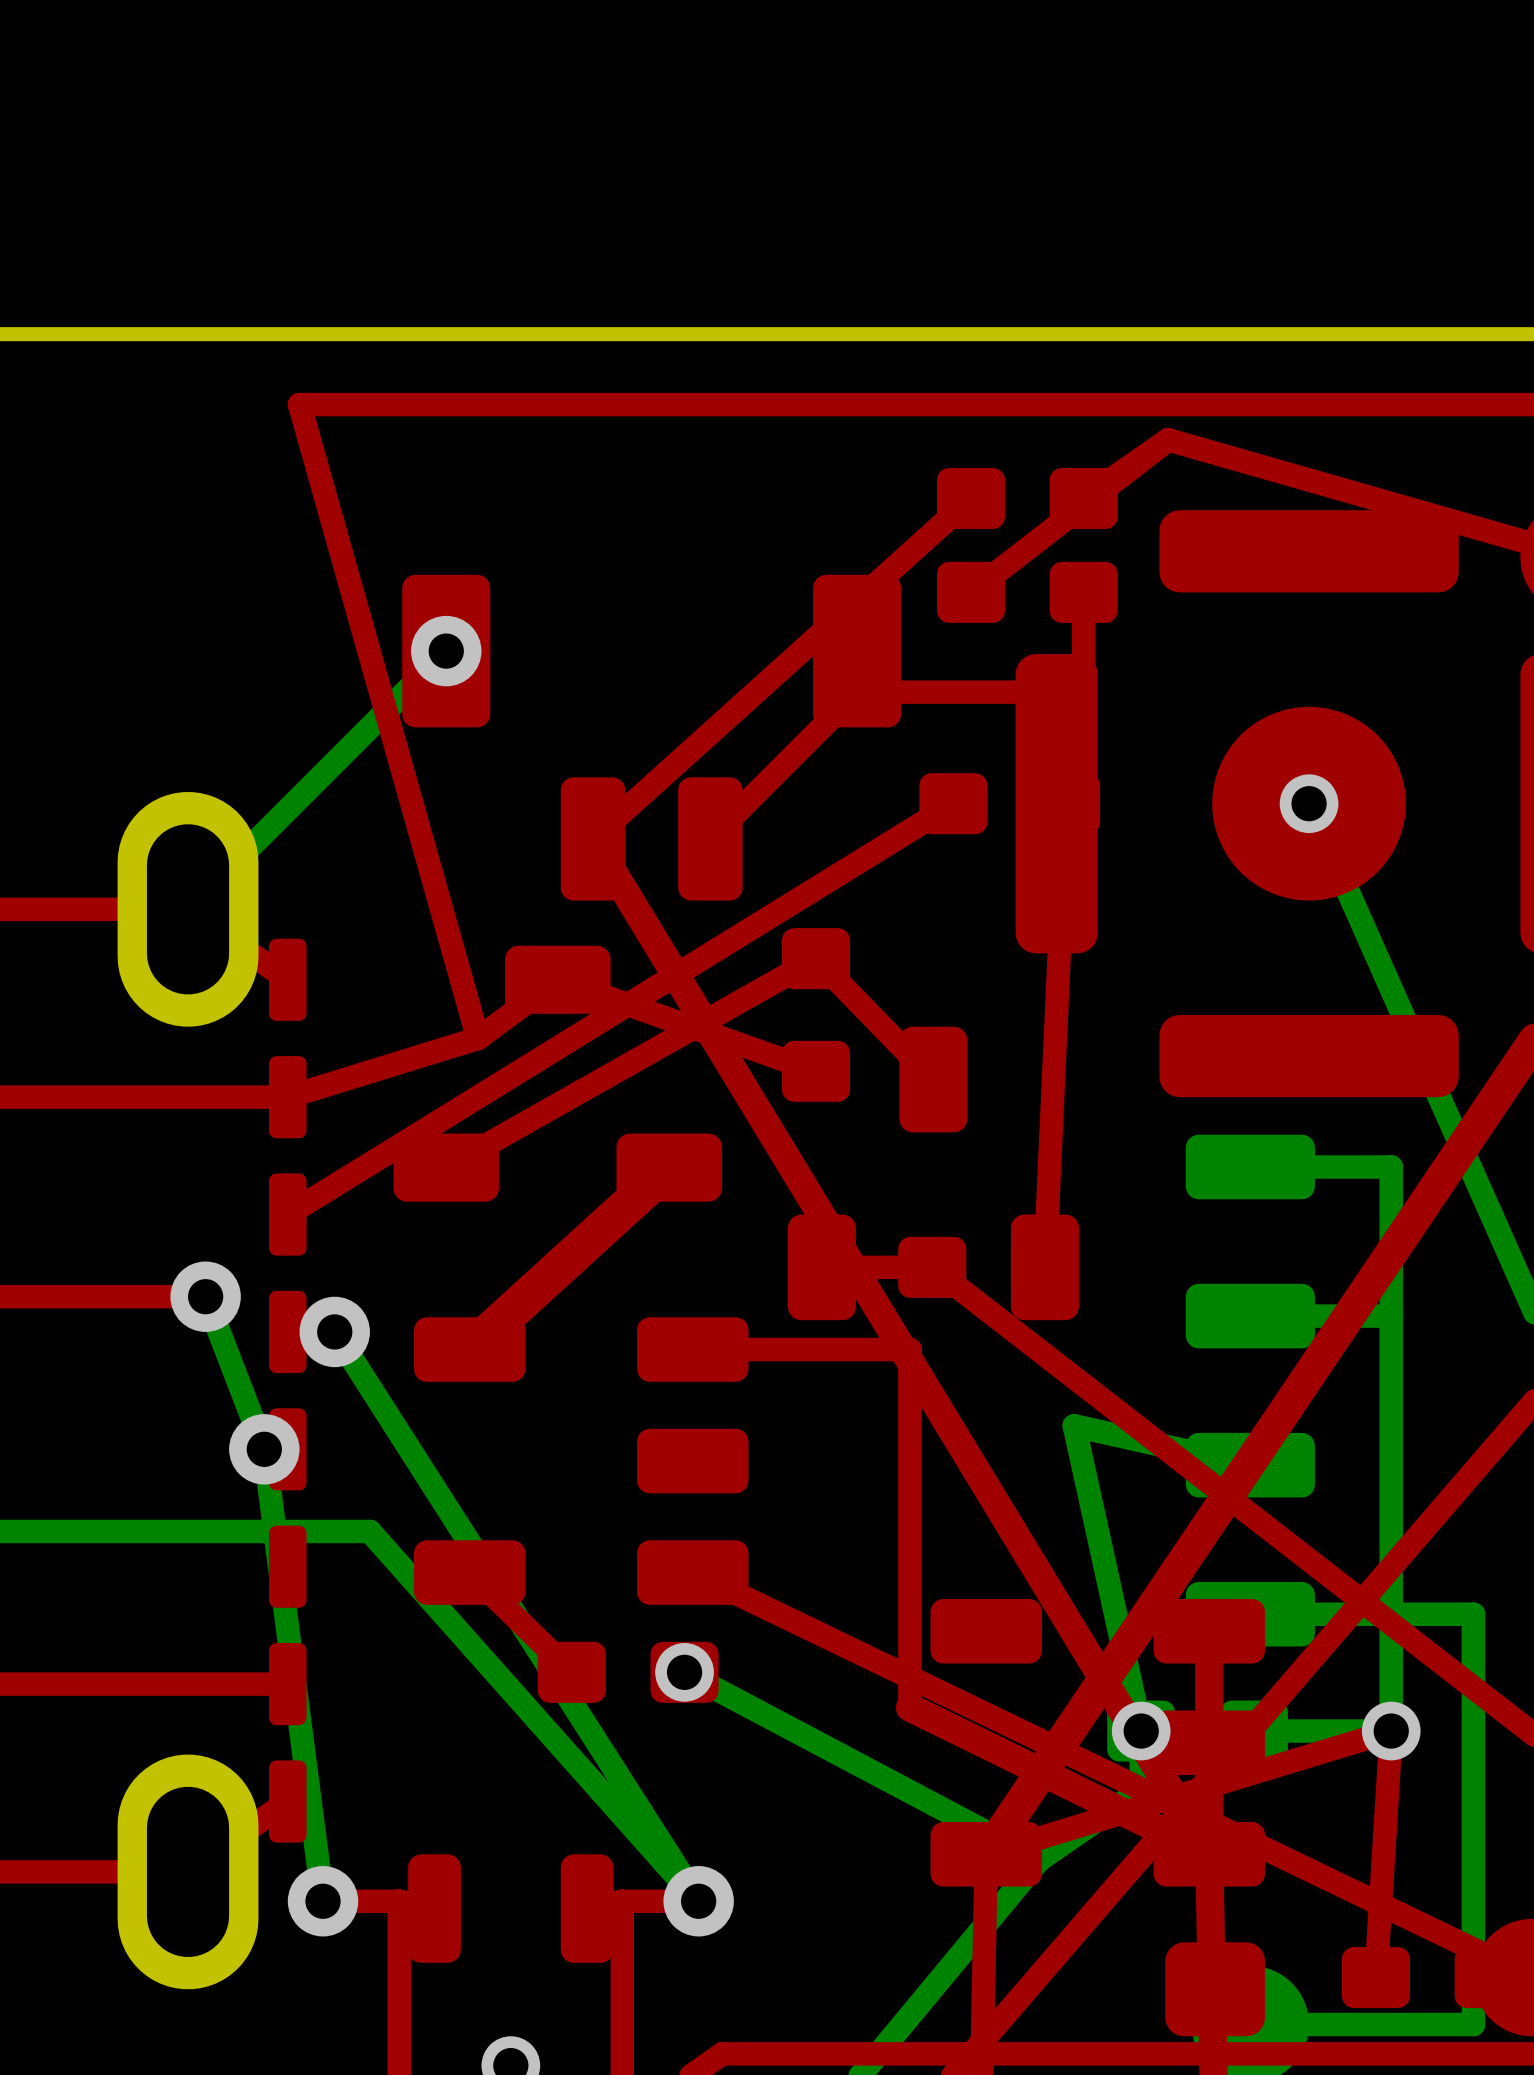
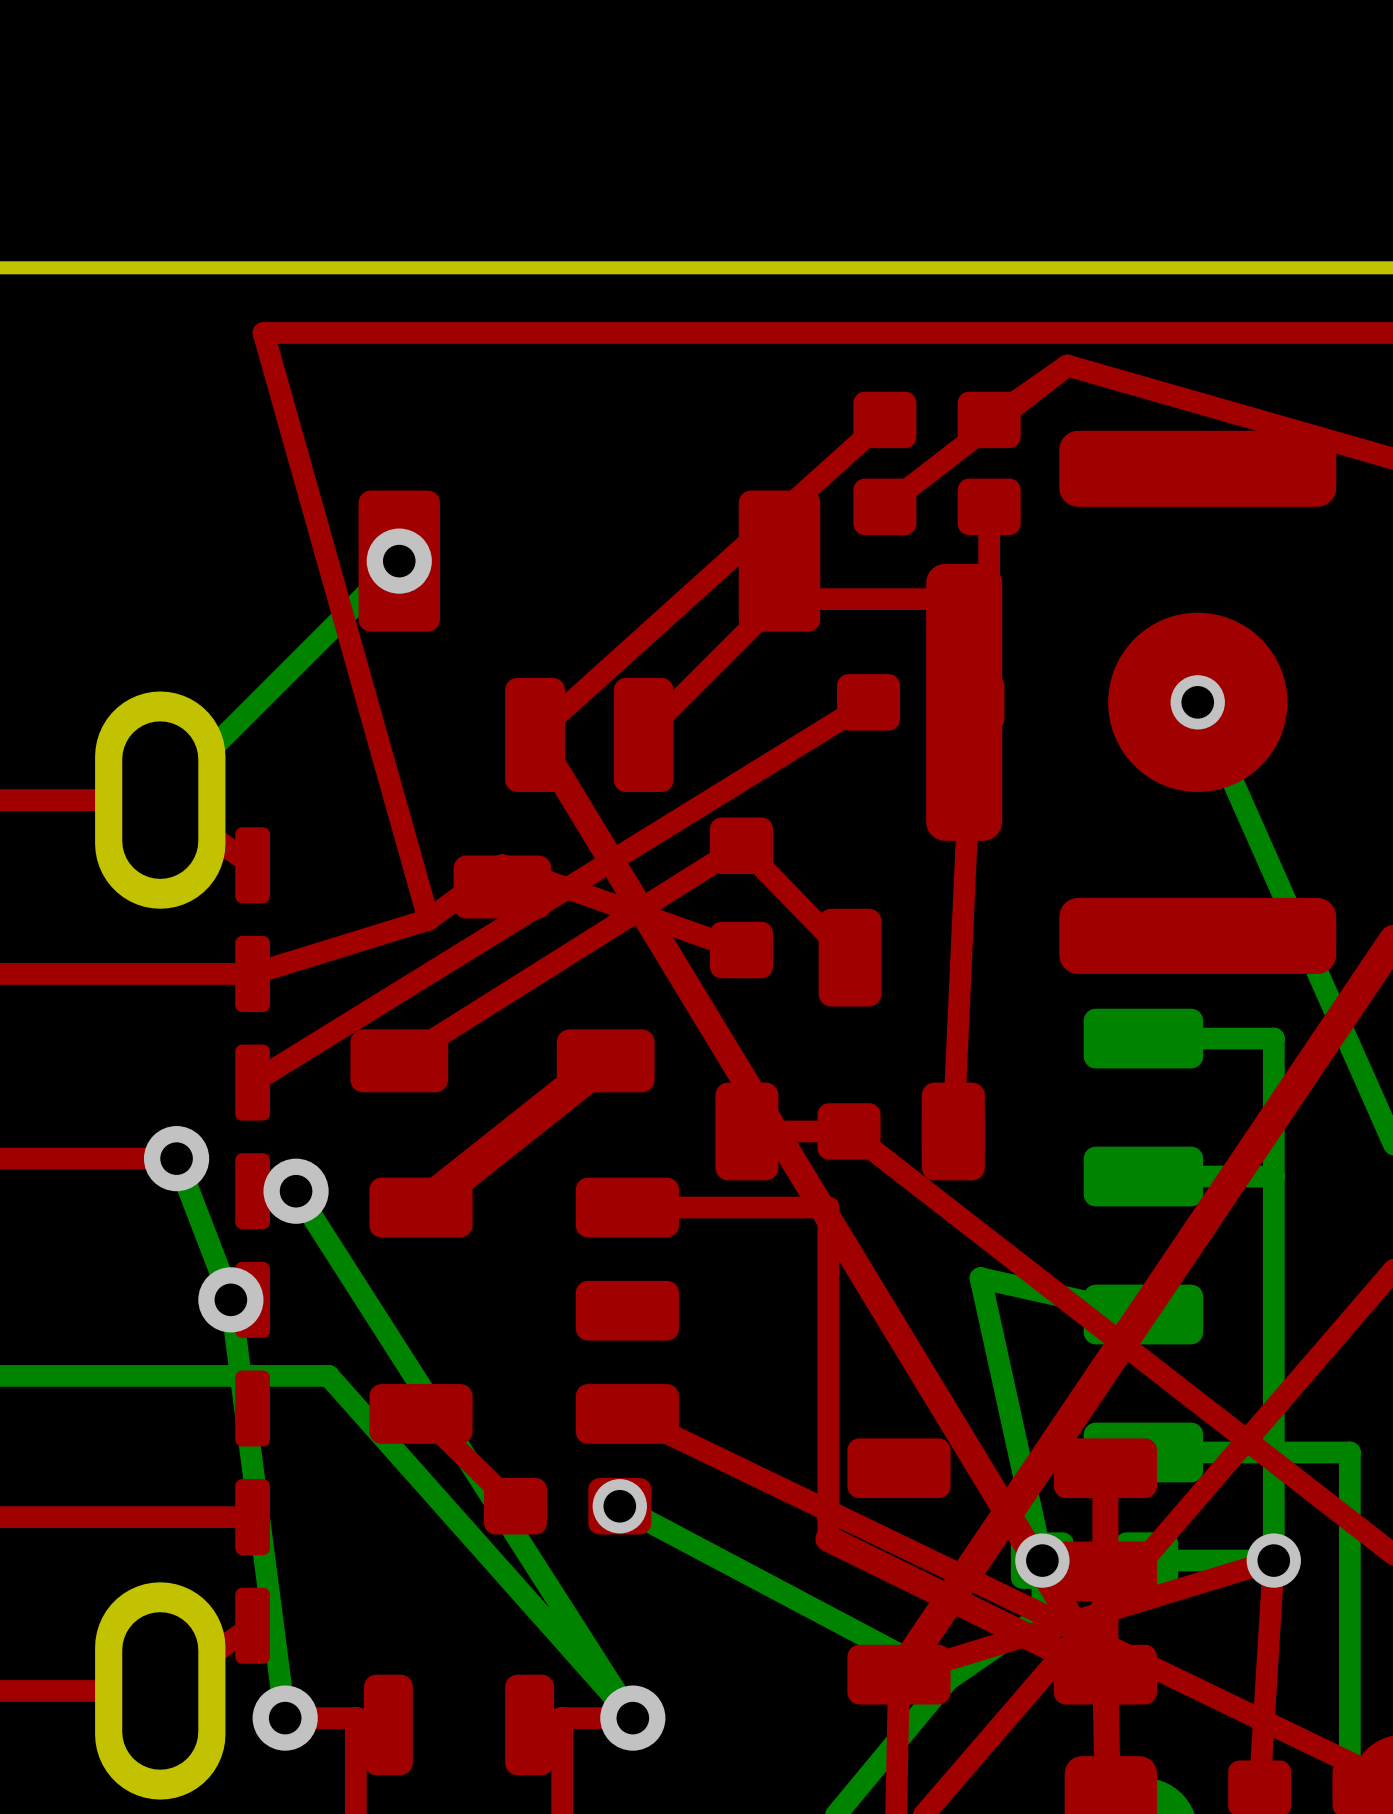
top track: (816, 958) (446, 1167) -> (741, 845) (399, 1060)
part position: (557, 1073) -> (502, 973)
top track: (669, 1167) (469, 1349) -> (605, 1060) (420, 1207)

